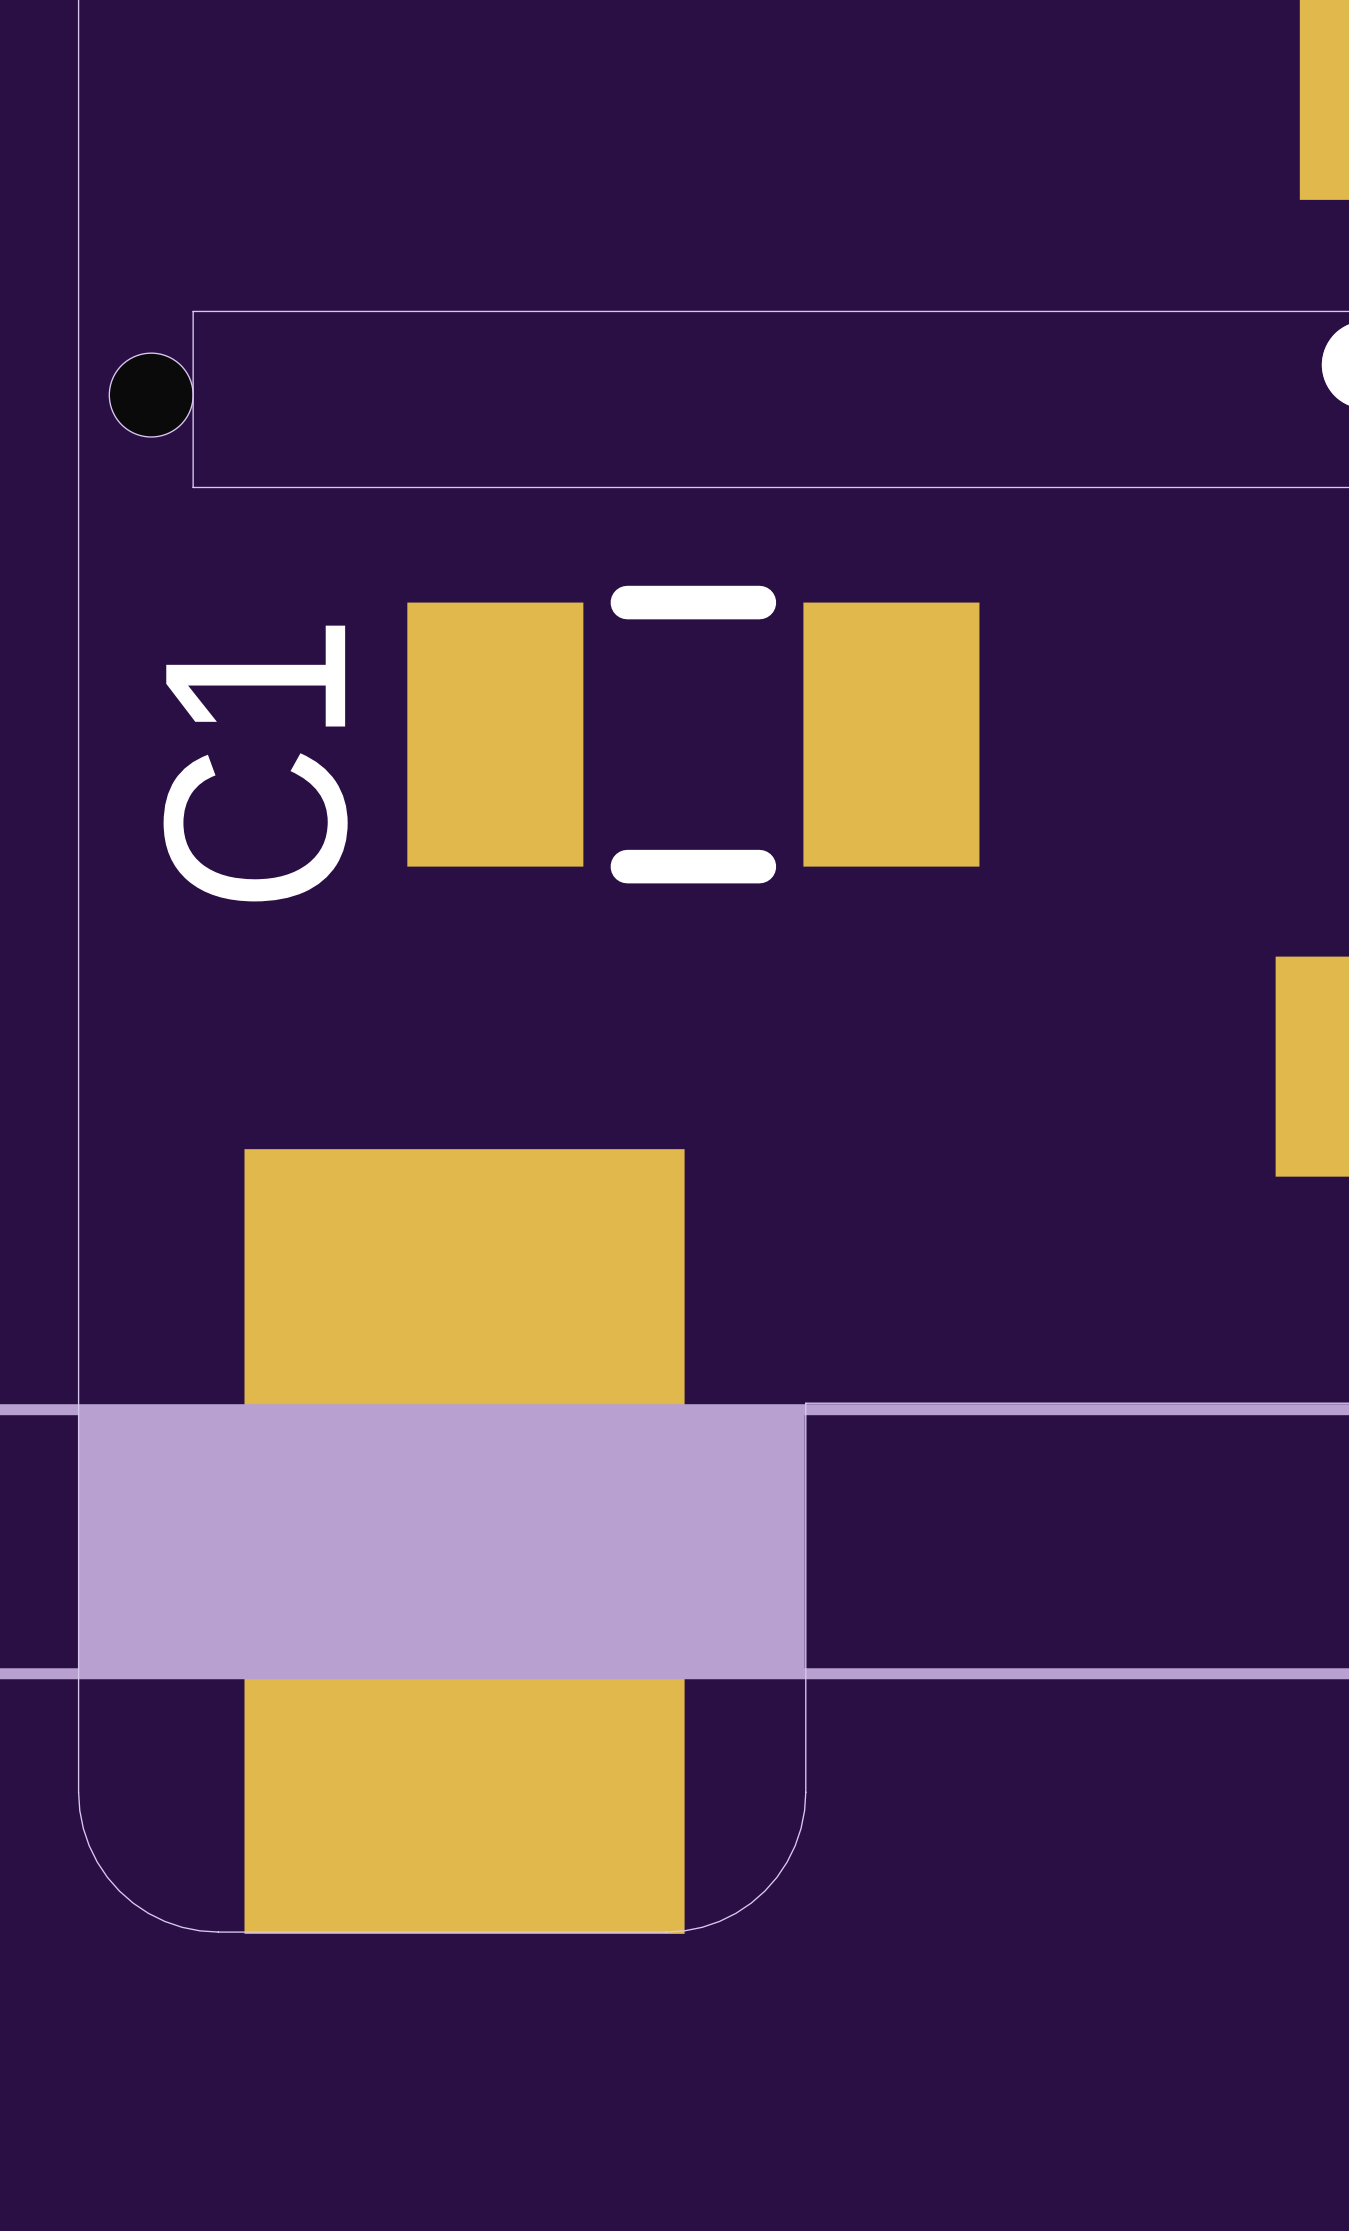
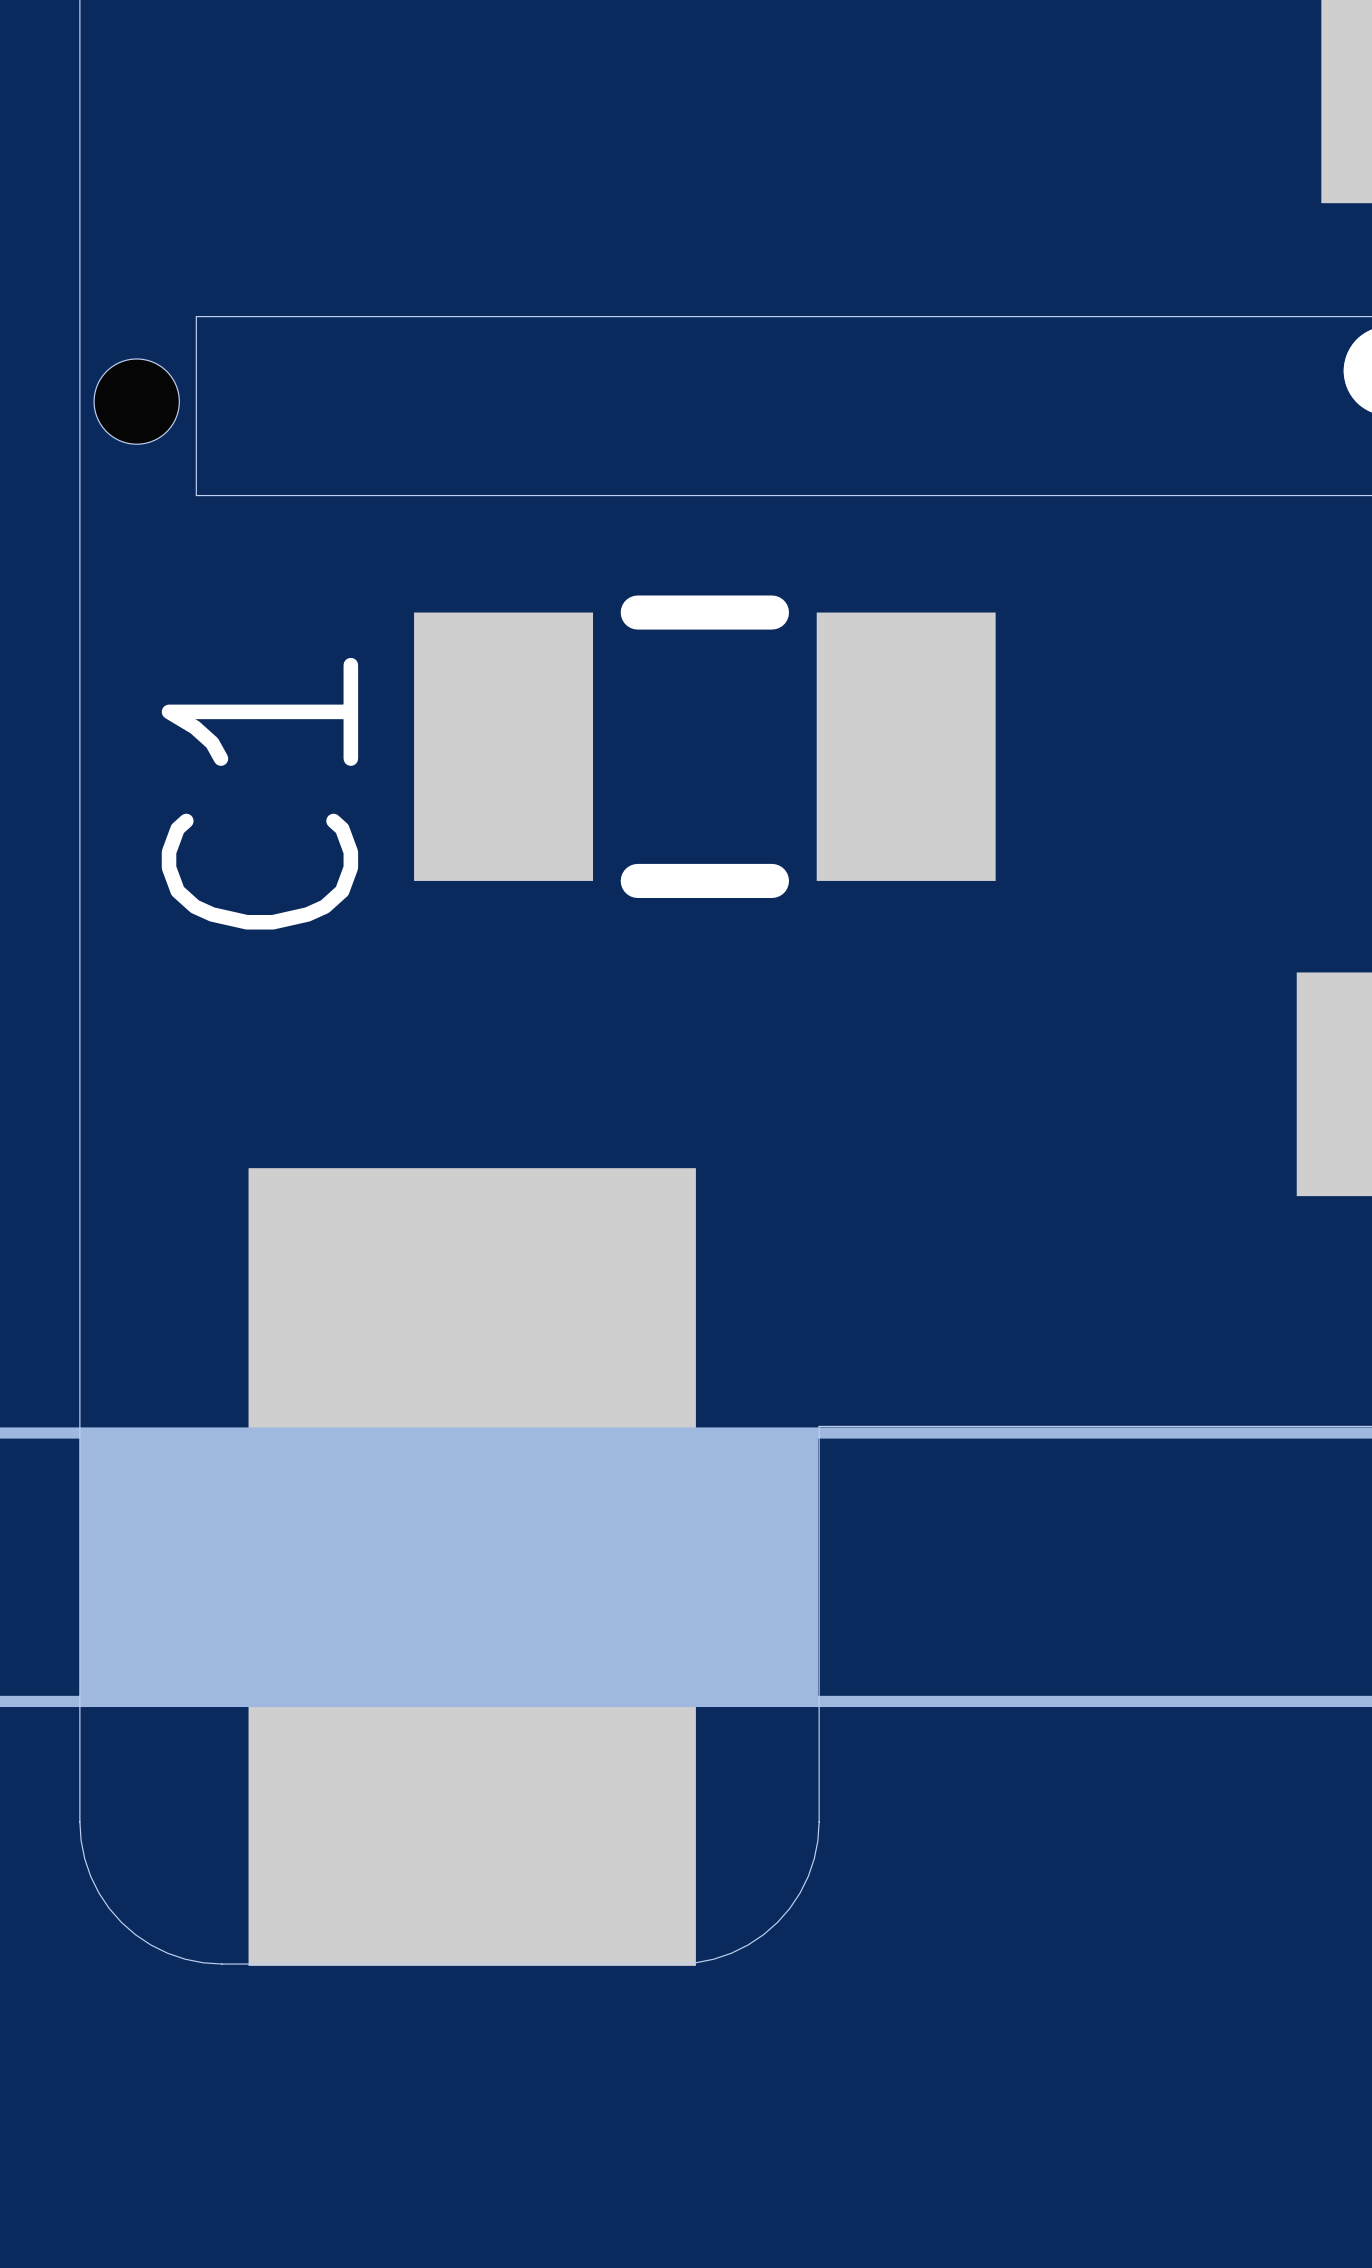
hole position: (151, 395) -> (136, 401)

